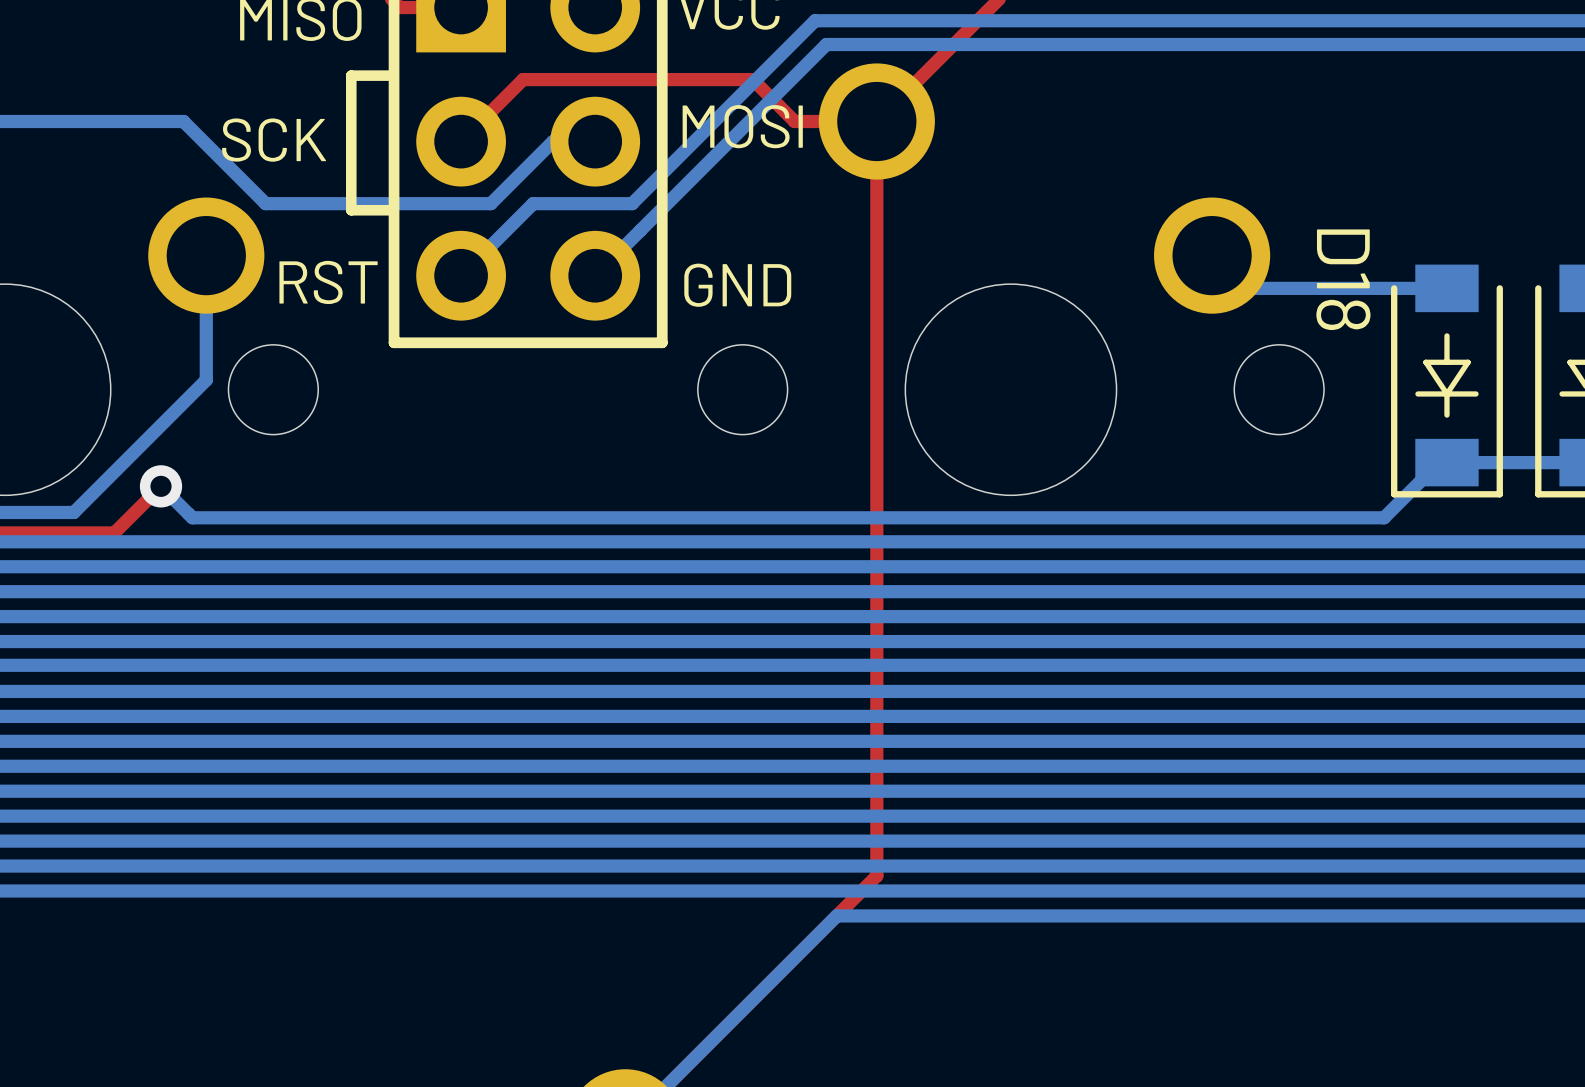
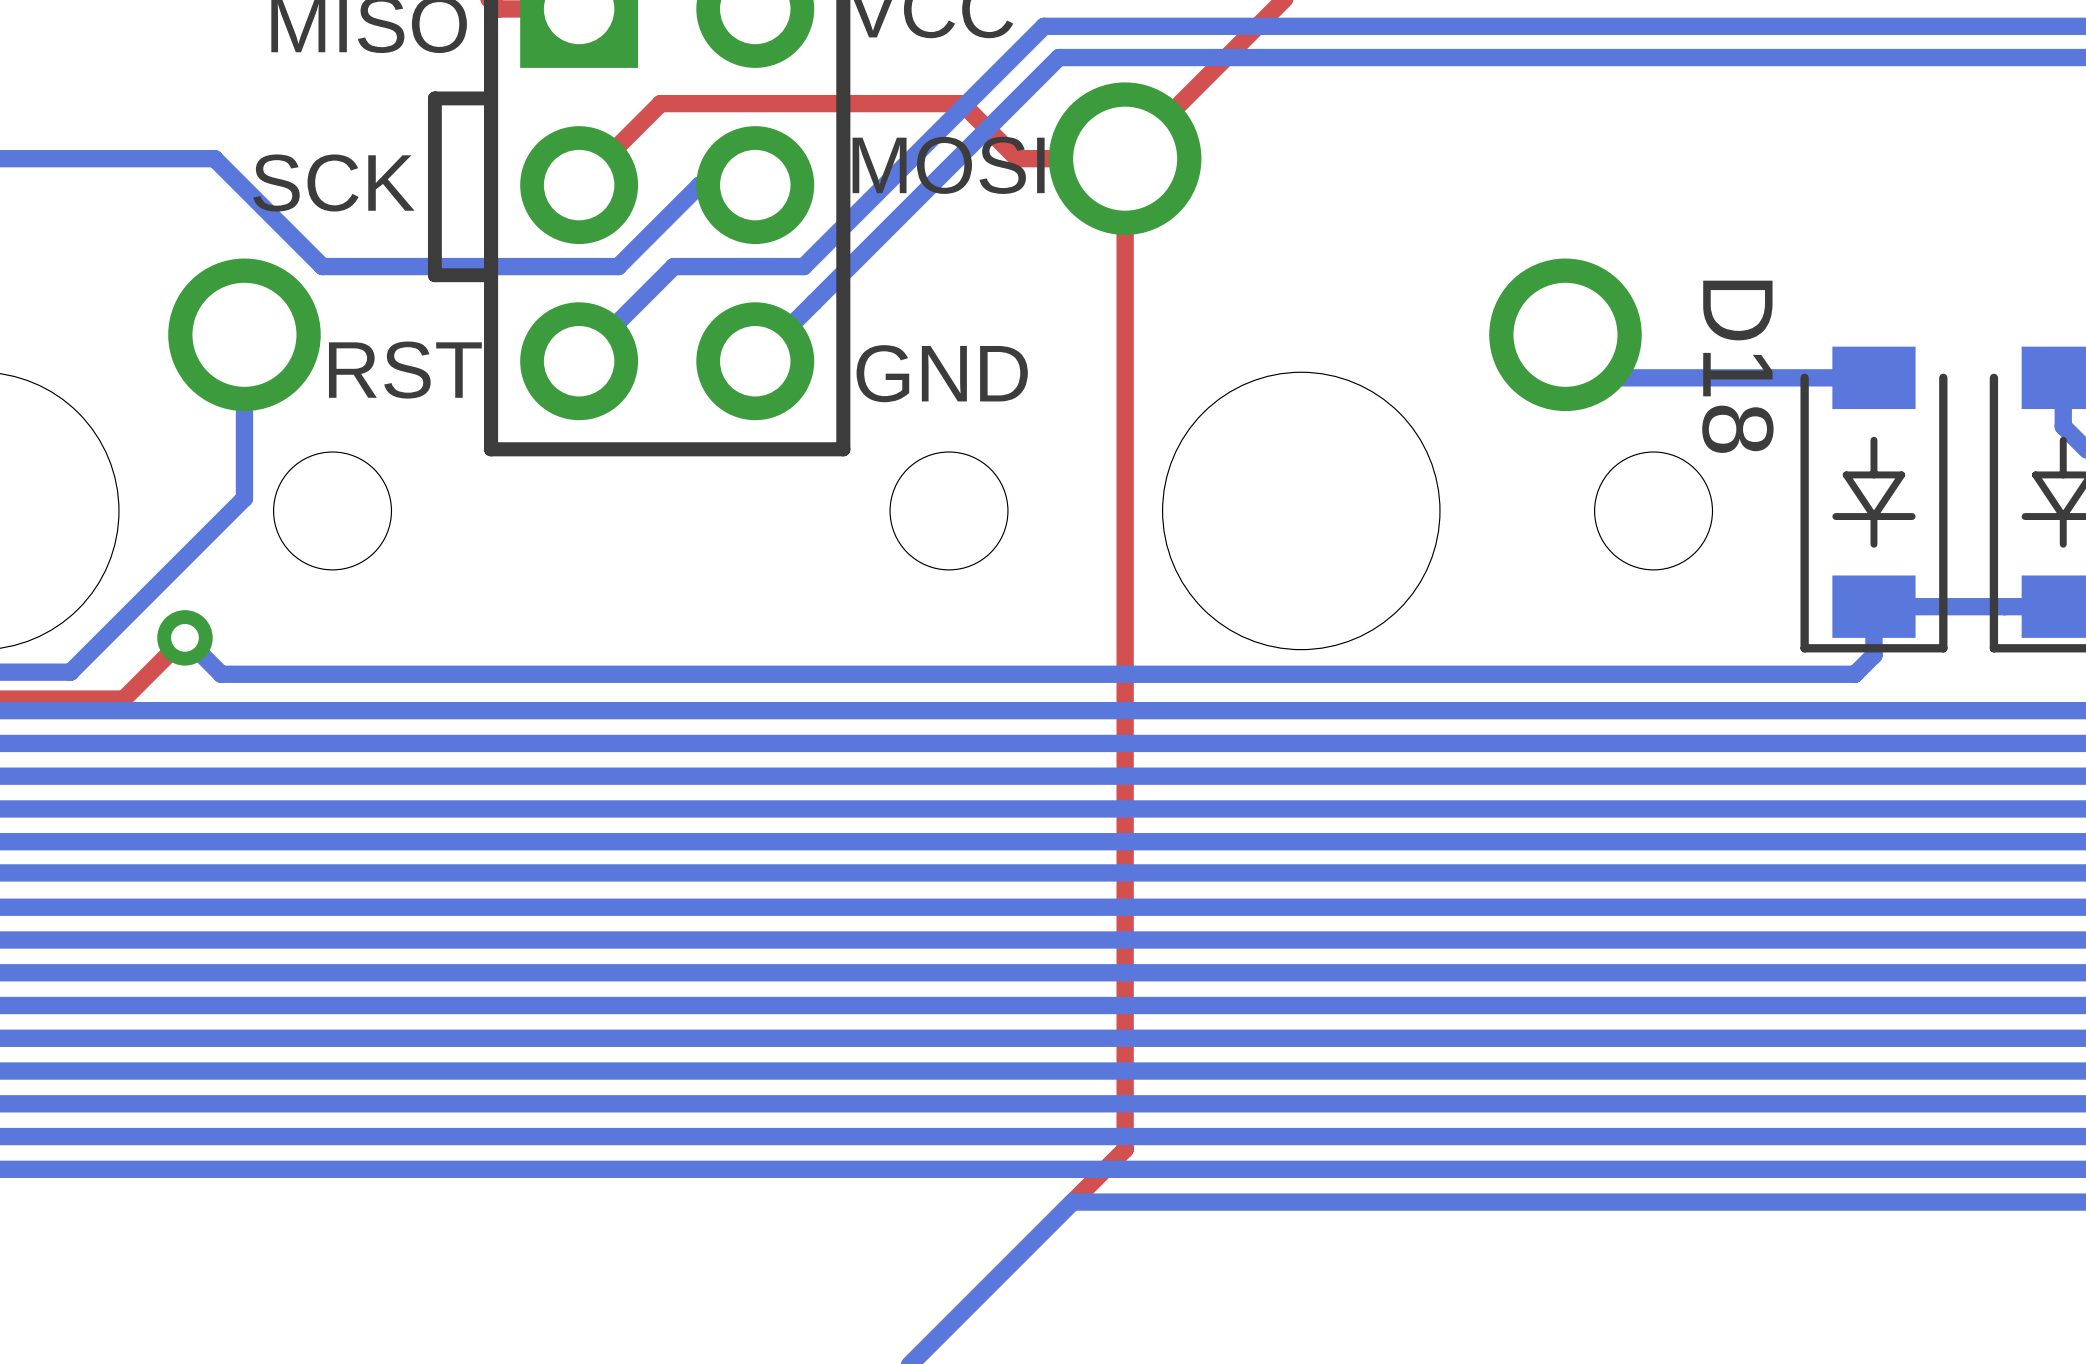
bottom track: (1446, 462) (1439, 462) (1384, 517) (192, 517) (188, 514) -> (1873, 606) (1873, 655) (1854, 674) (221, 674)

